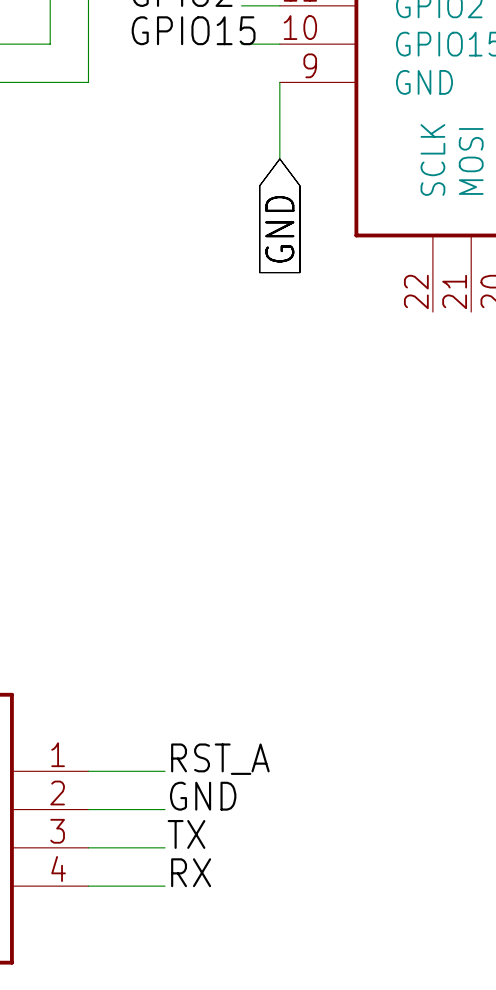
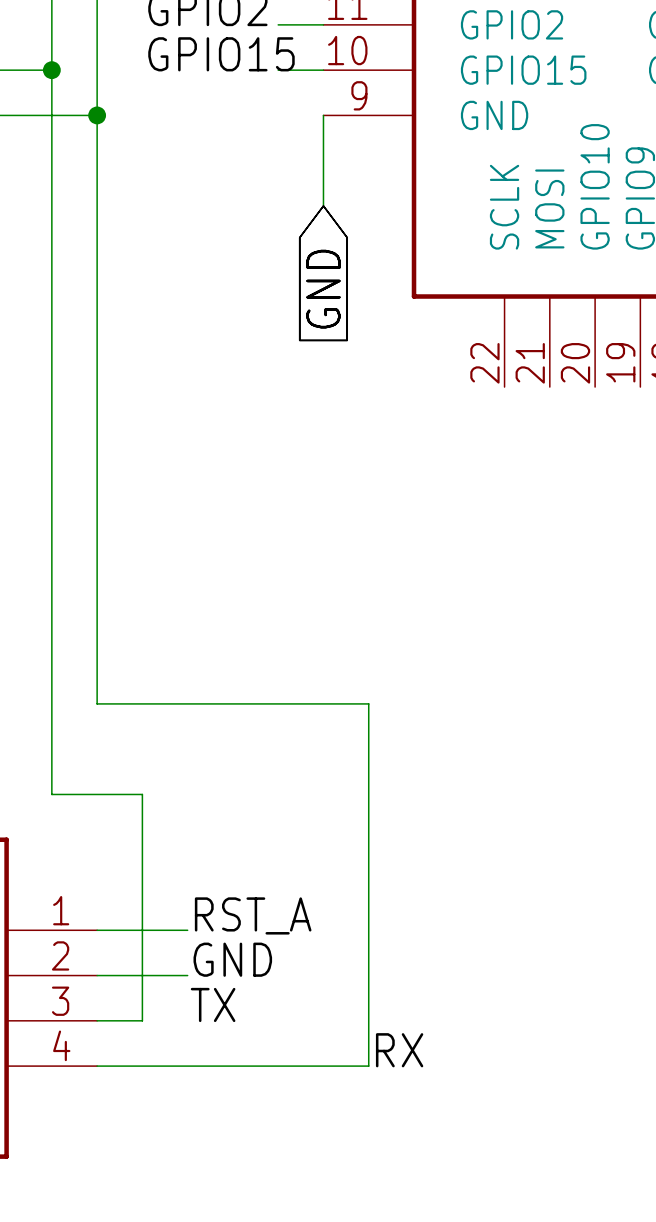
junction: none -> (51, 70)
wire: none -> (97, 115) (97, 703) (368, 703) (368, 1066) (187, 1066)
junction: none -> (97, 115)
wire: (126, 847) (165, 847) -> (142, 1020) (142, 794) (51, 794) (51, 70)
label position: RX (191, 872) -> RX (399, 1050)

